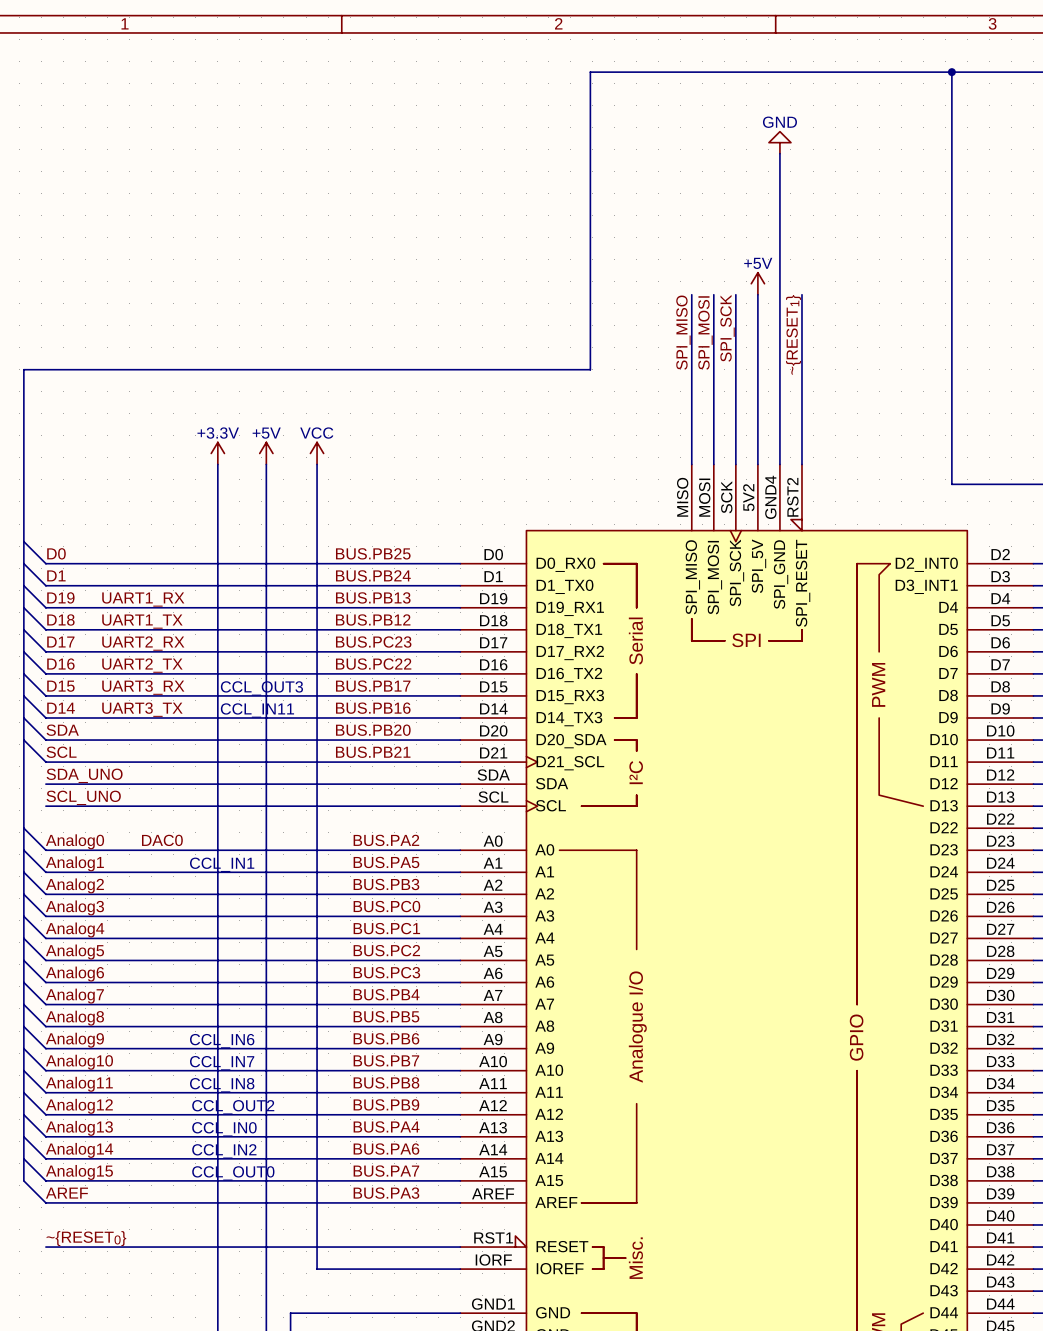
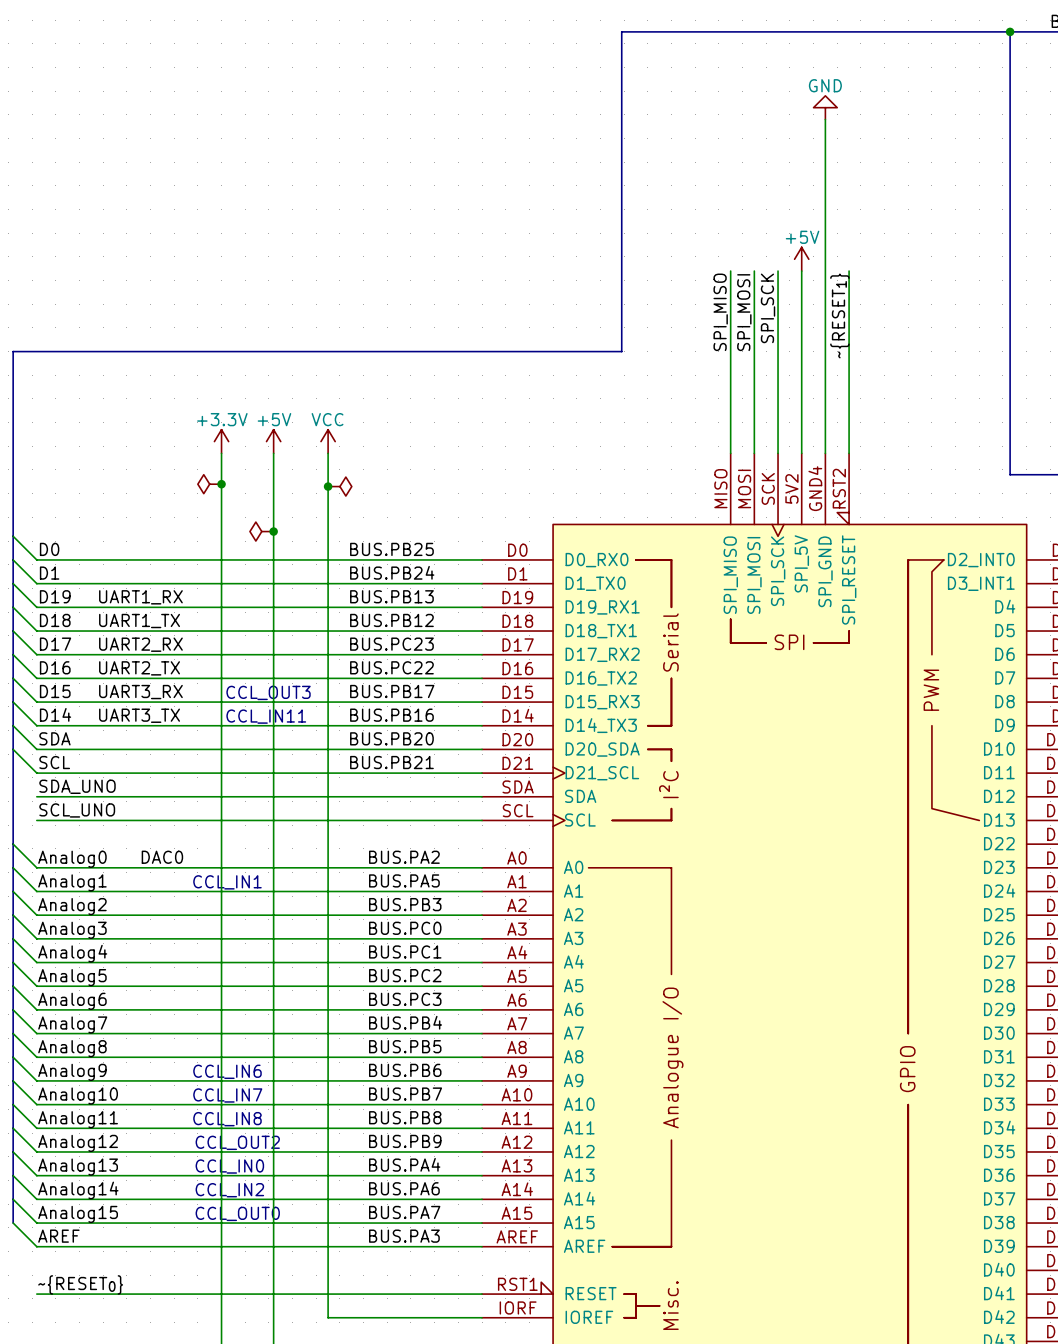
power symbol: none -> (209, 484)
junction: none -> (221, 484)
junction: none -> (328, 486)
power symbol: none -> (339, 486)
power symbol: none -> (261, 531)
junction: none -> (273, 531)

